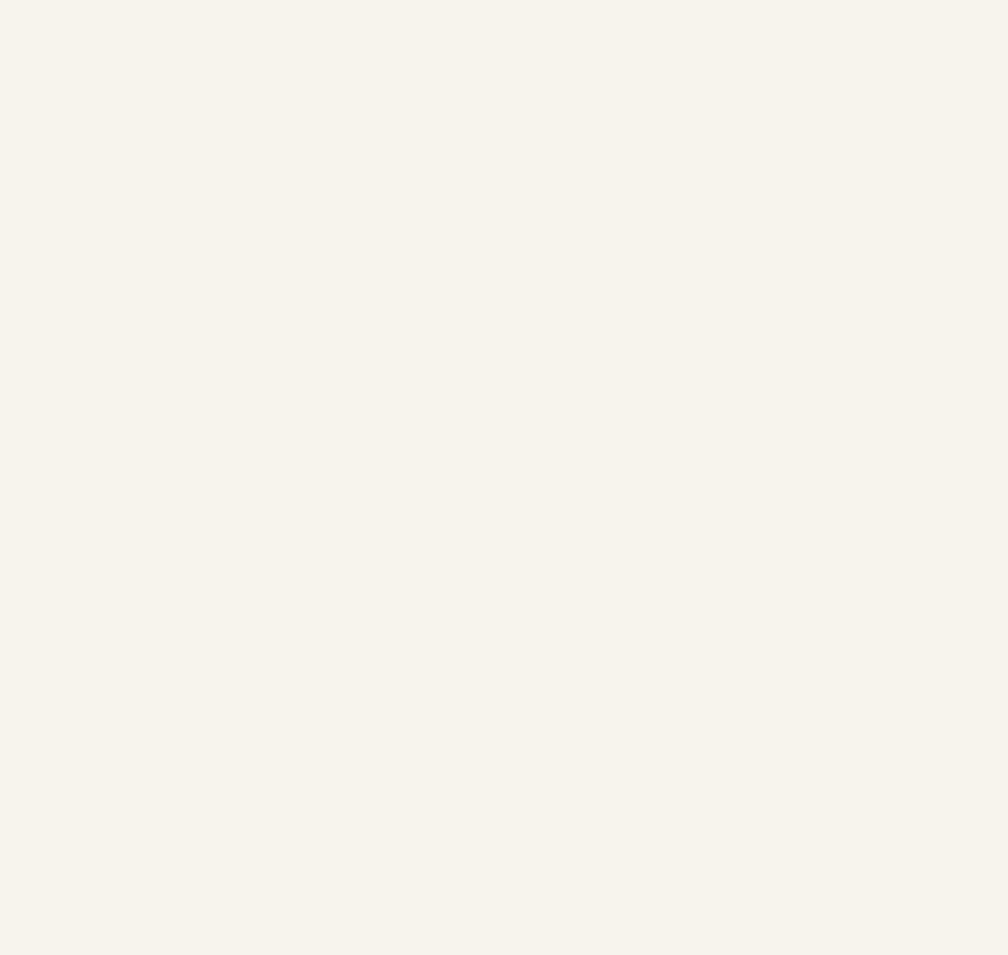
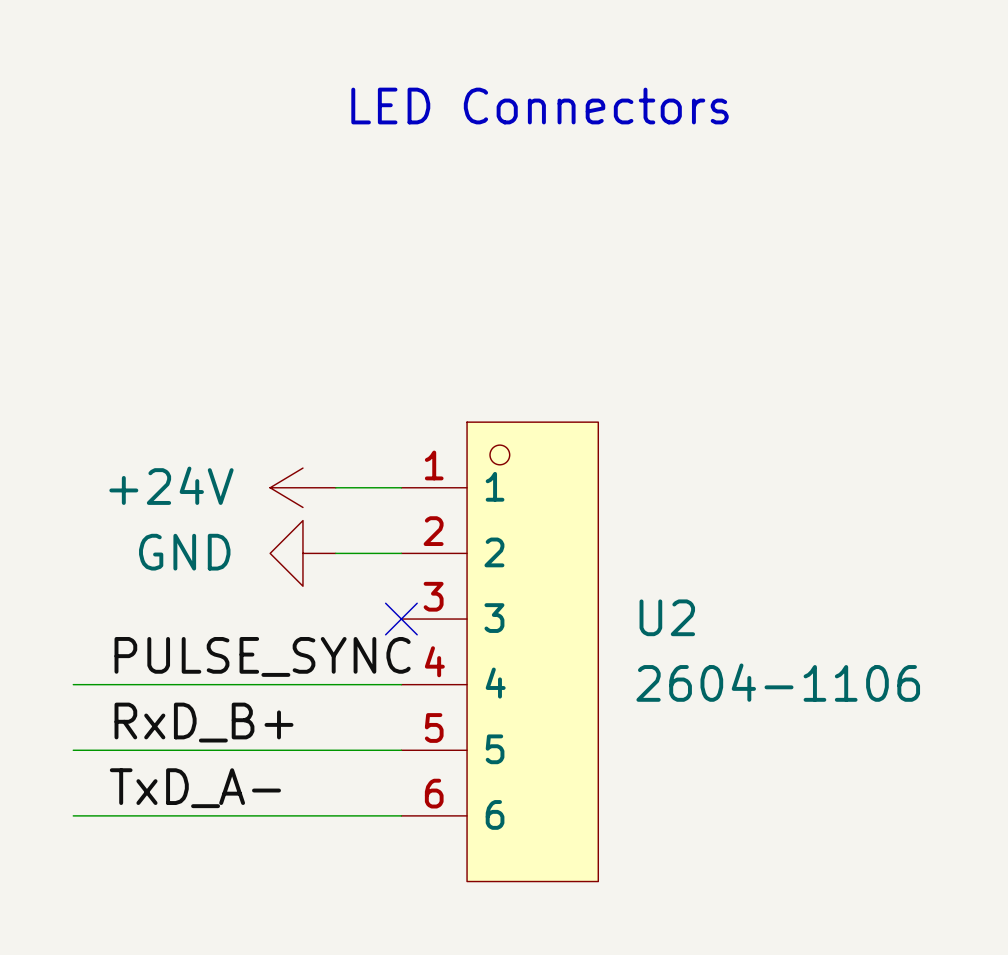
text: none -> LED Connectors (540, 106)
power symbol: none -> +24V (302, 487)
wire: none -> (335, 487) (401, 487)
power symbol: none -> GND (302, 553)
wire: none -> (335, 553) (401, 553)
no-connect mark: none -> (401, 619)
U2: none -> 2604-1106 (499, 651)
label: none -> PULSE_SYNC (262, 656)
wire: none -> (73, 684) (401, 684)
label: none -> RxD_B+ (204, 722)
wire: none -> (73, 750) (401, 750)
label: none -> TxD_A- (195, 788)
wire: none -> (73, 815) (401, 815)

